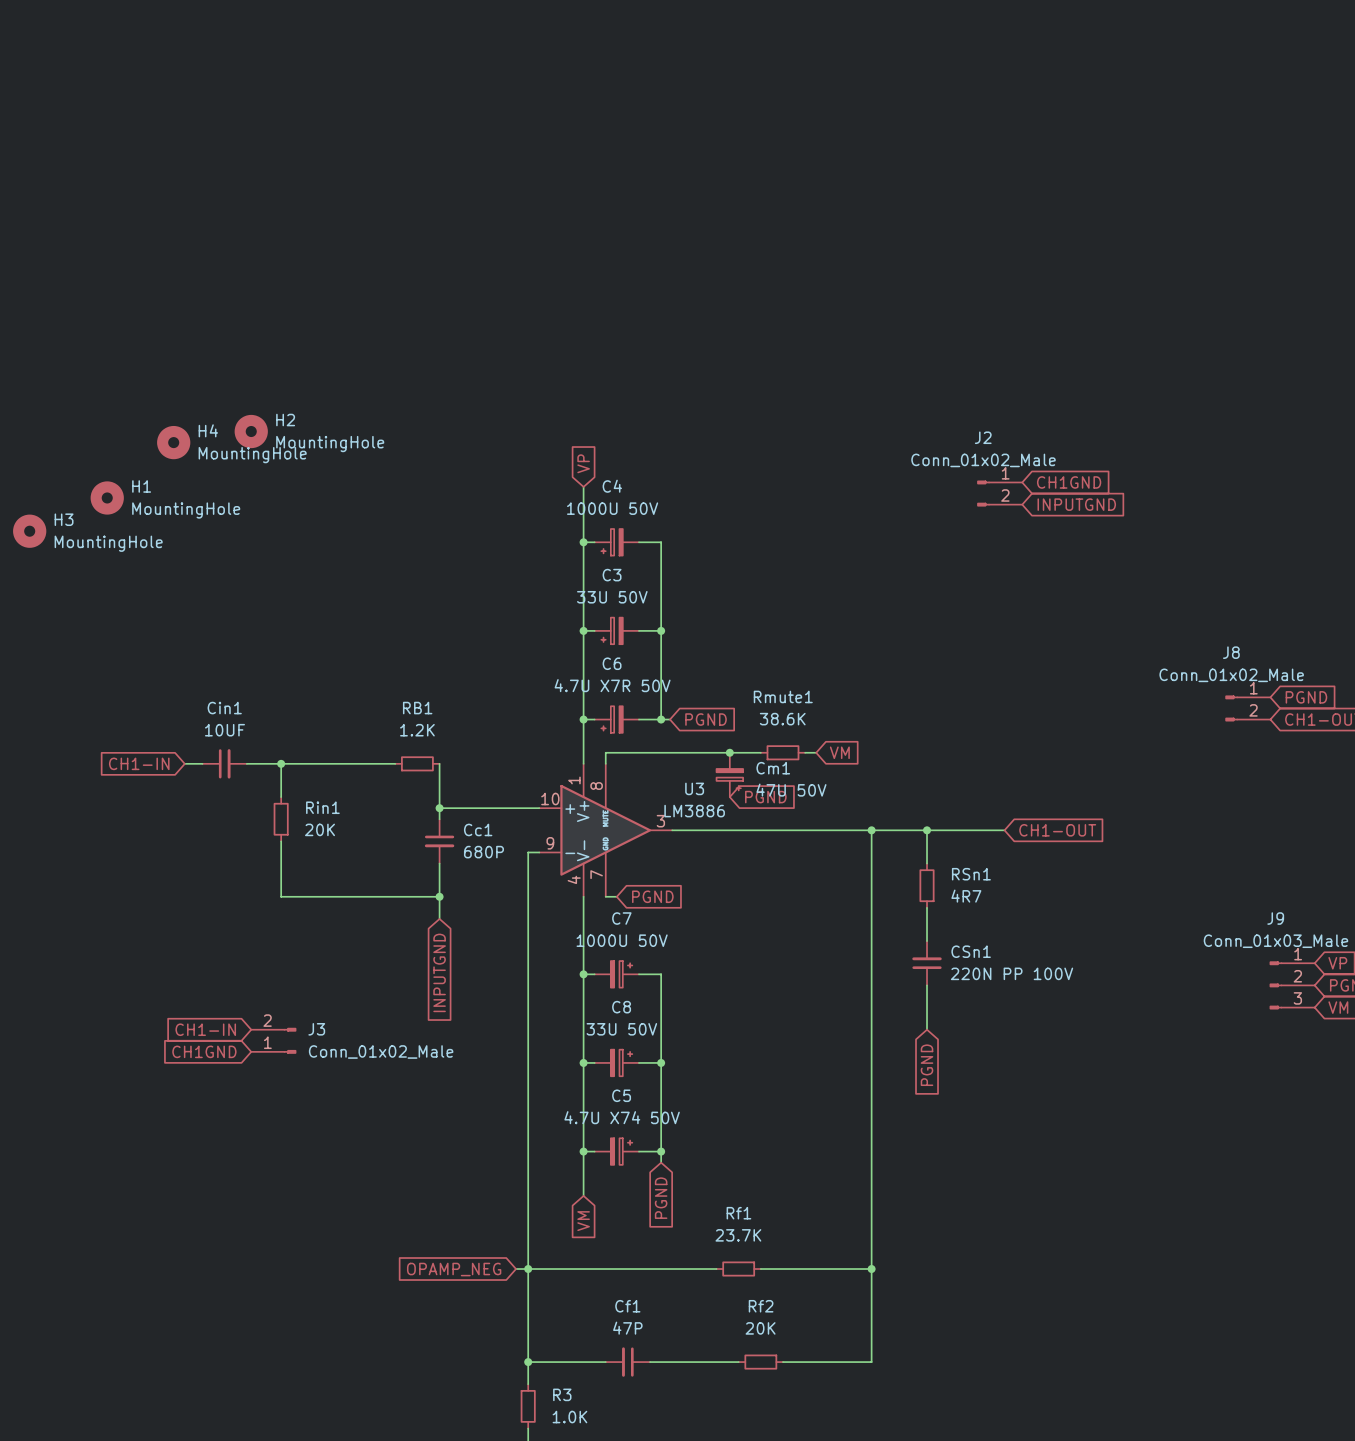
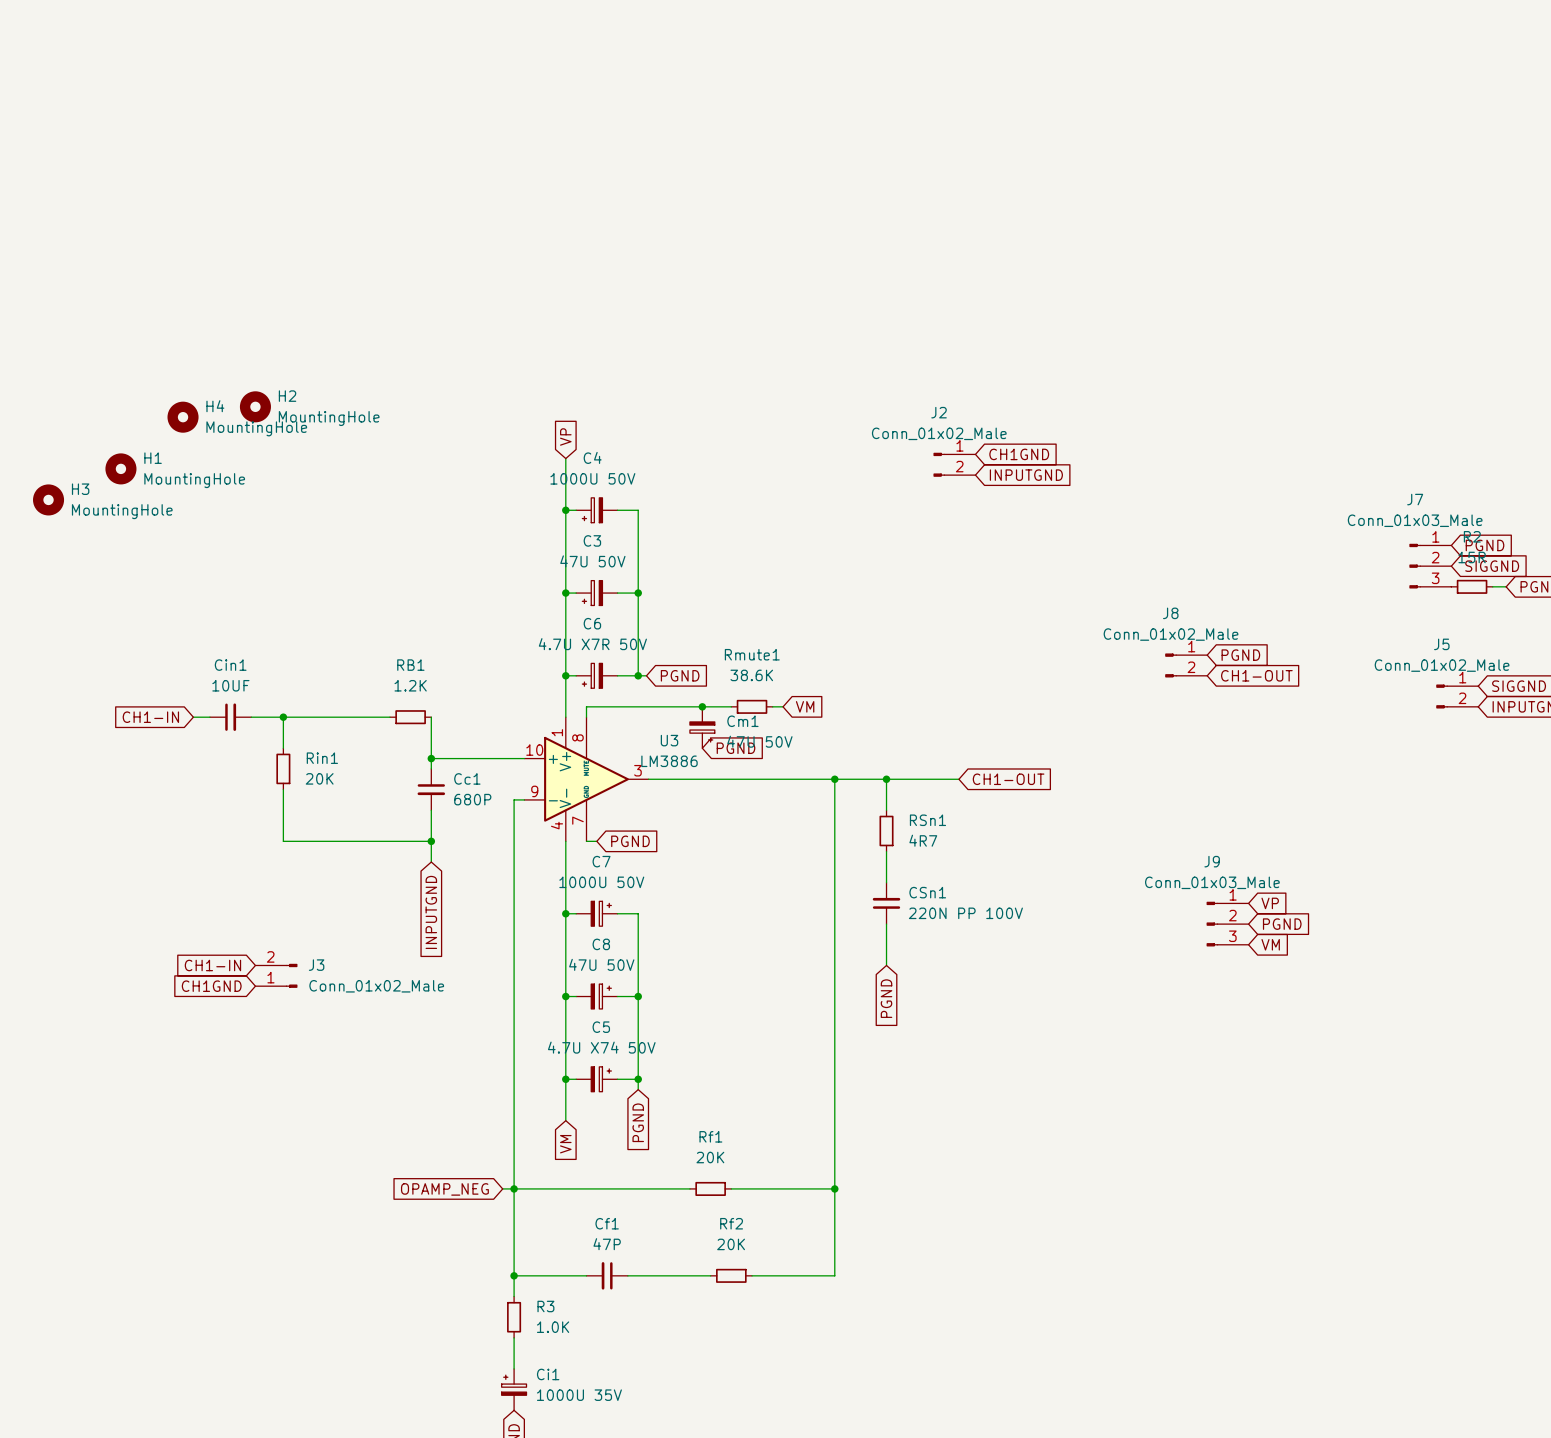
C3 value: 33U 50V (612, 597) -> 47U 50V (592, 561)
C8 value: 33U 50V (621, 1029) -> 47U 50V (601, 964)
Rf1 value: 23.7K (738, 1235) -> 20K (710, 1157)

